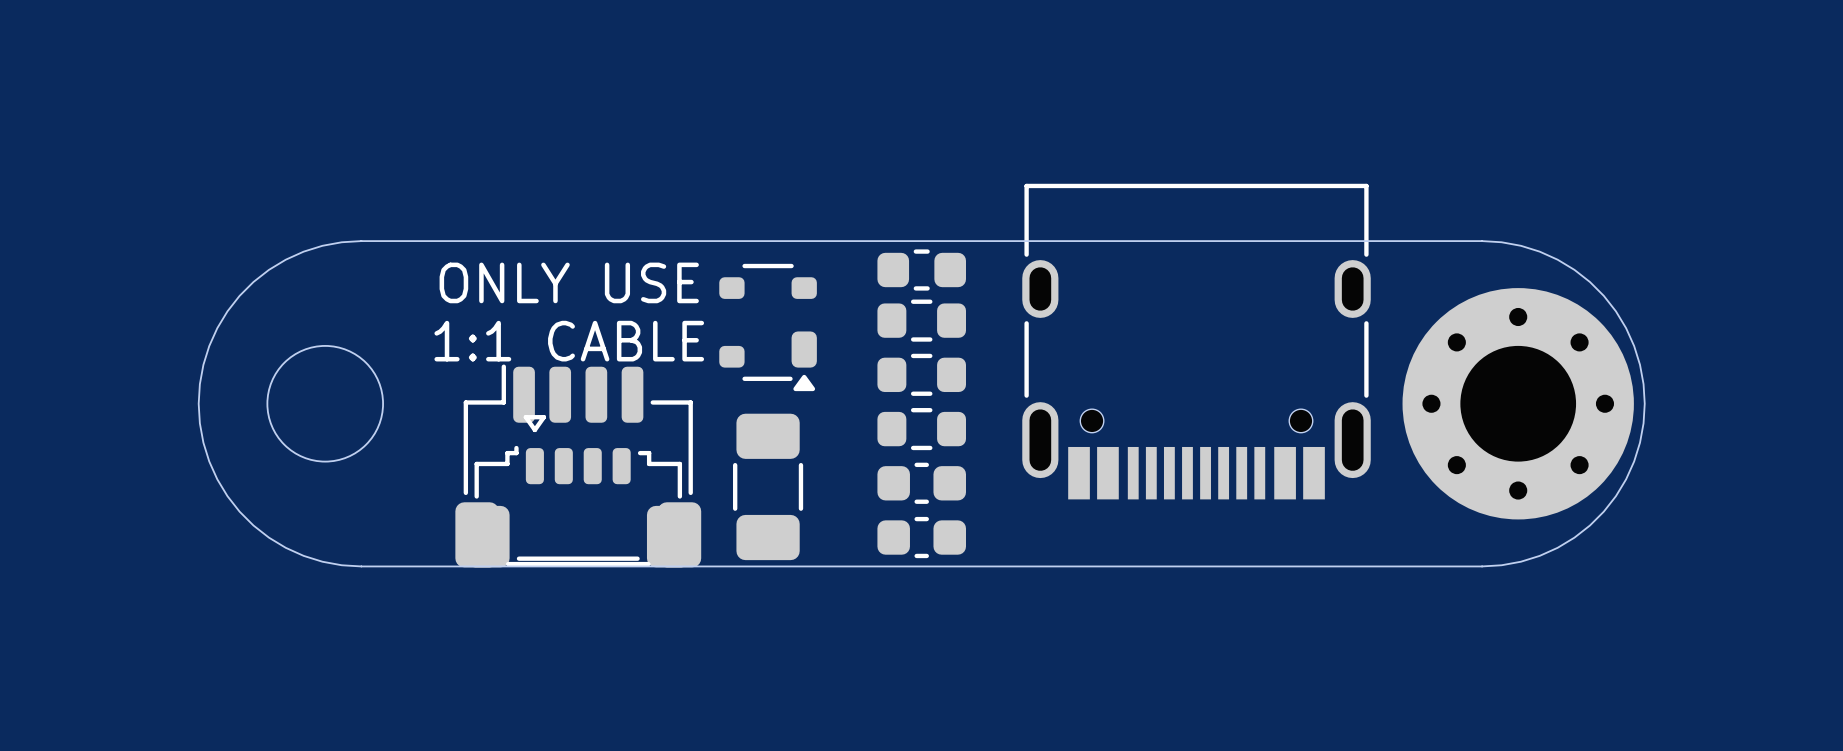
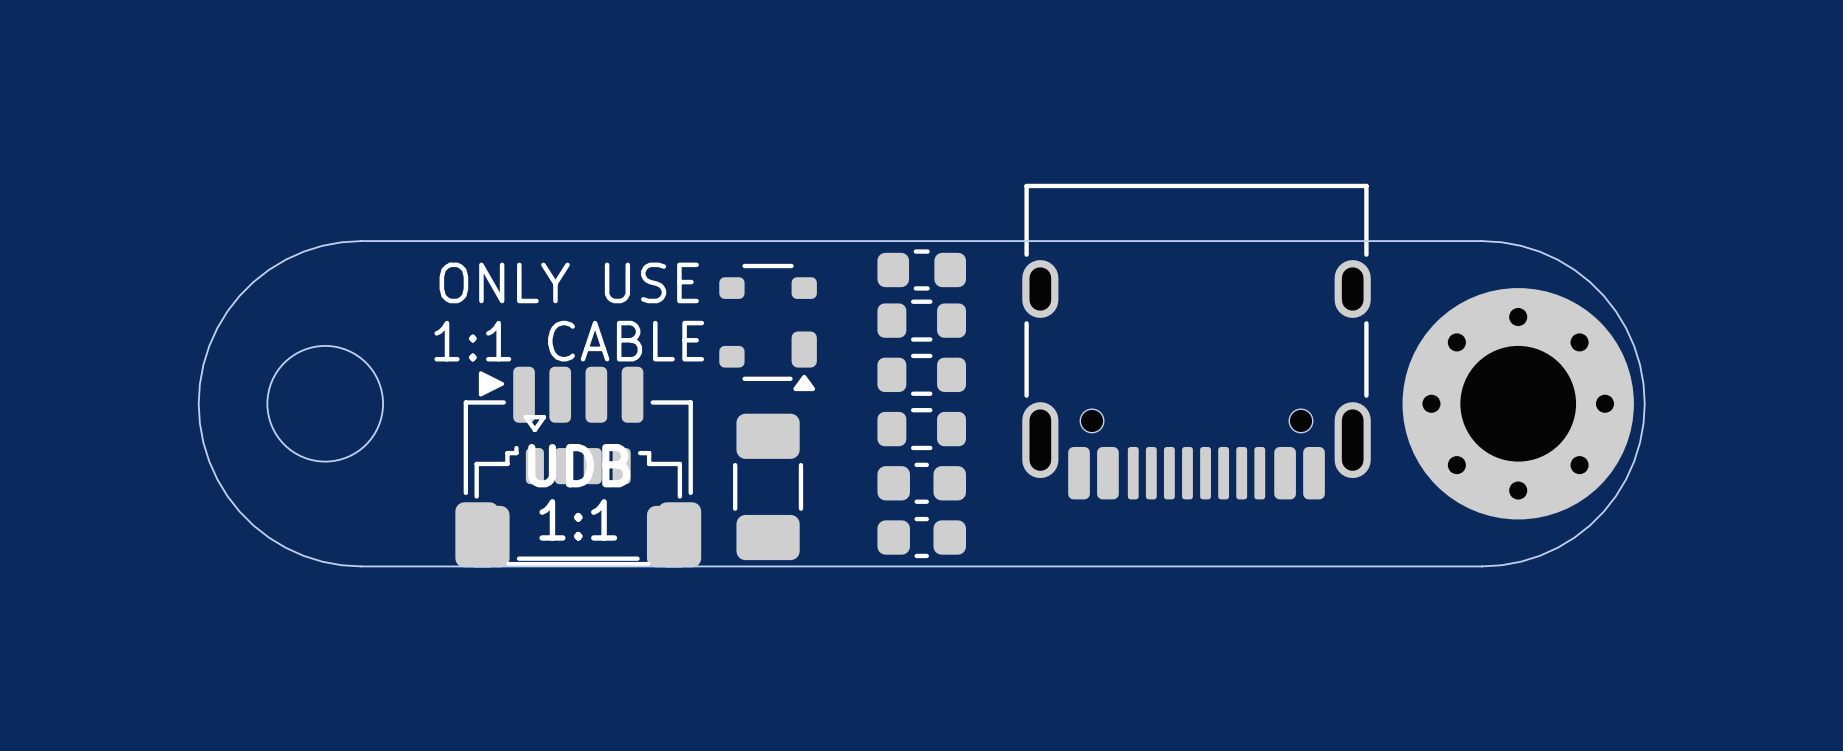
part footprint: [1022, 183, 1371, 500] -> [1022, 183, 1371, 500]
part footprint: [455, 364, 702, 568] -> [455, 366, 702, 568]

